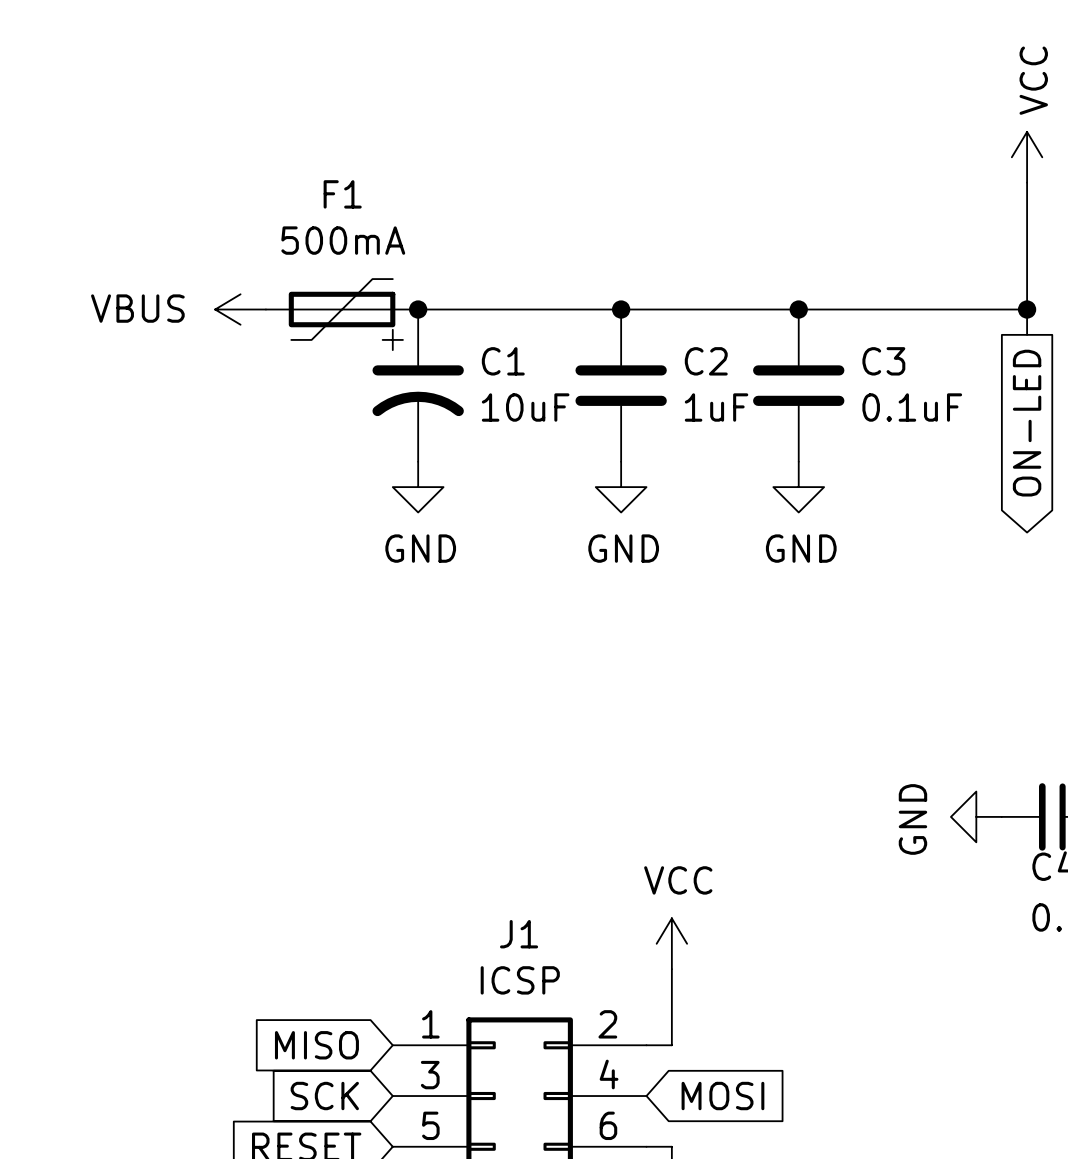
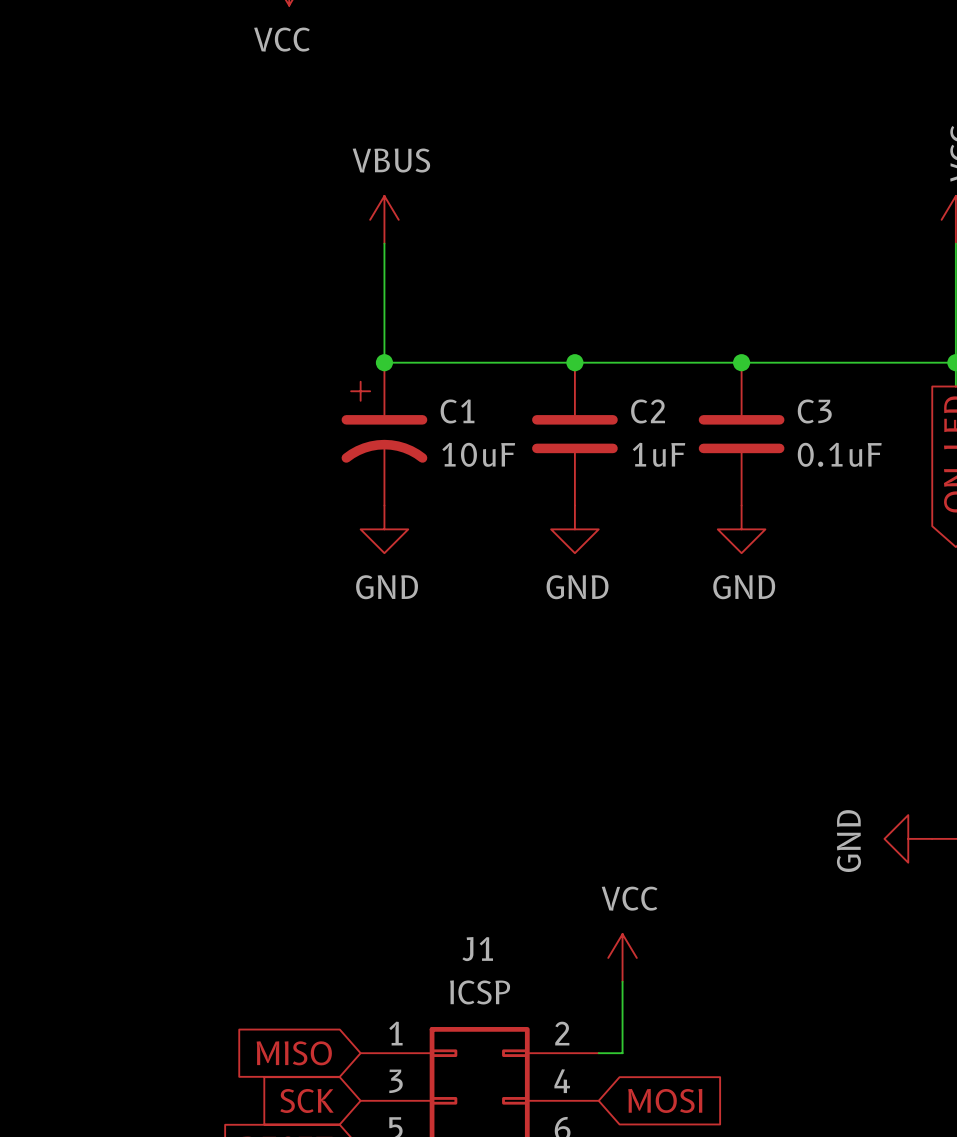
wire: none -> (384, 243) (384, 362)
power symbol text position: VBUS (137, 308) -> VBUS (391, 160)
power symbol rotation: 0° (240, 309) -> 90° clockwise (384, 219)
power symbol position: VBUS (240, 309) -> VBUS (384, 219)
F1: 500mA (342, 309) -> none

